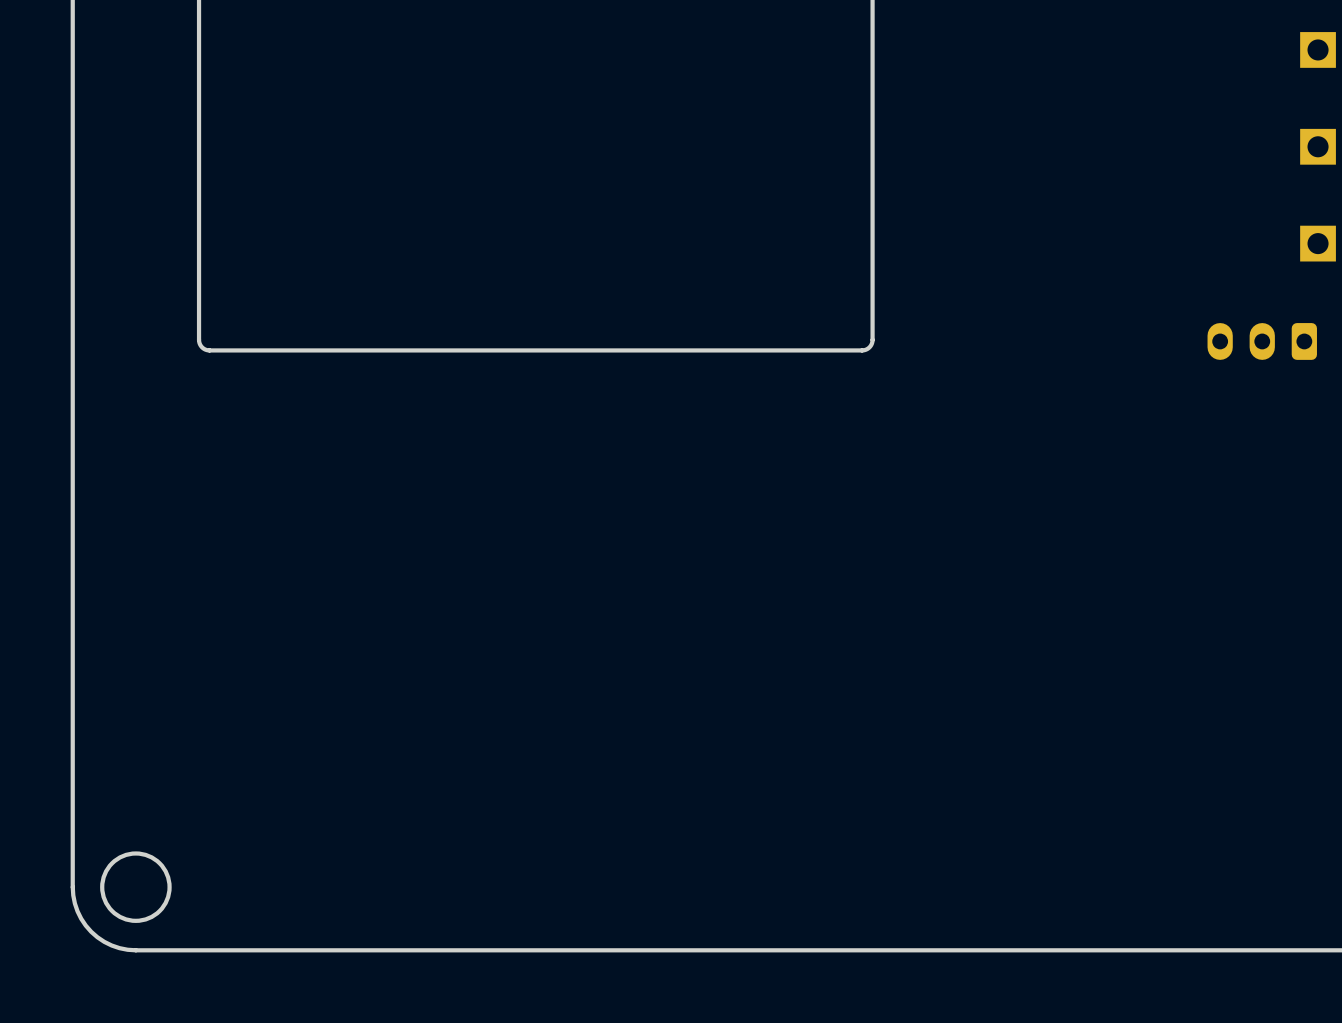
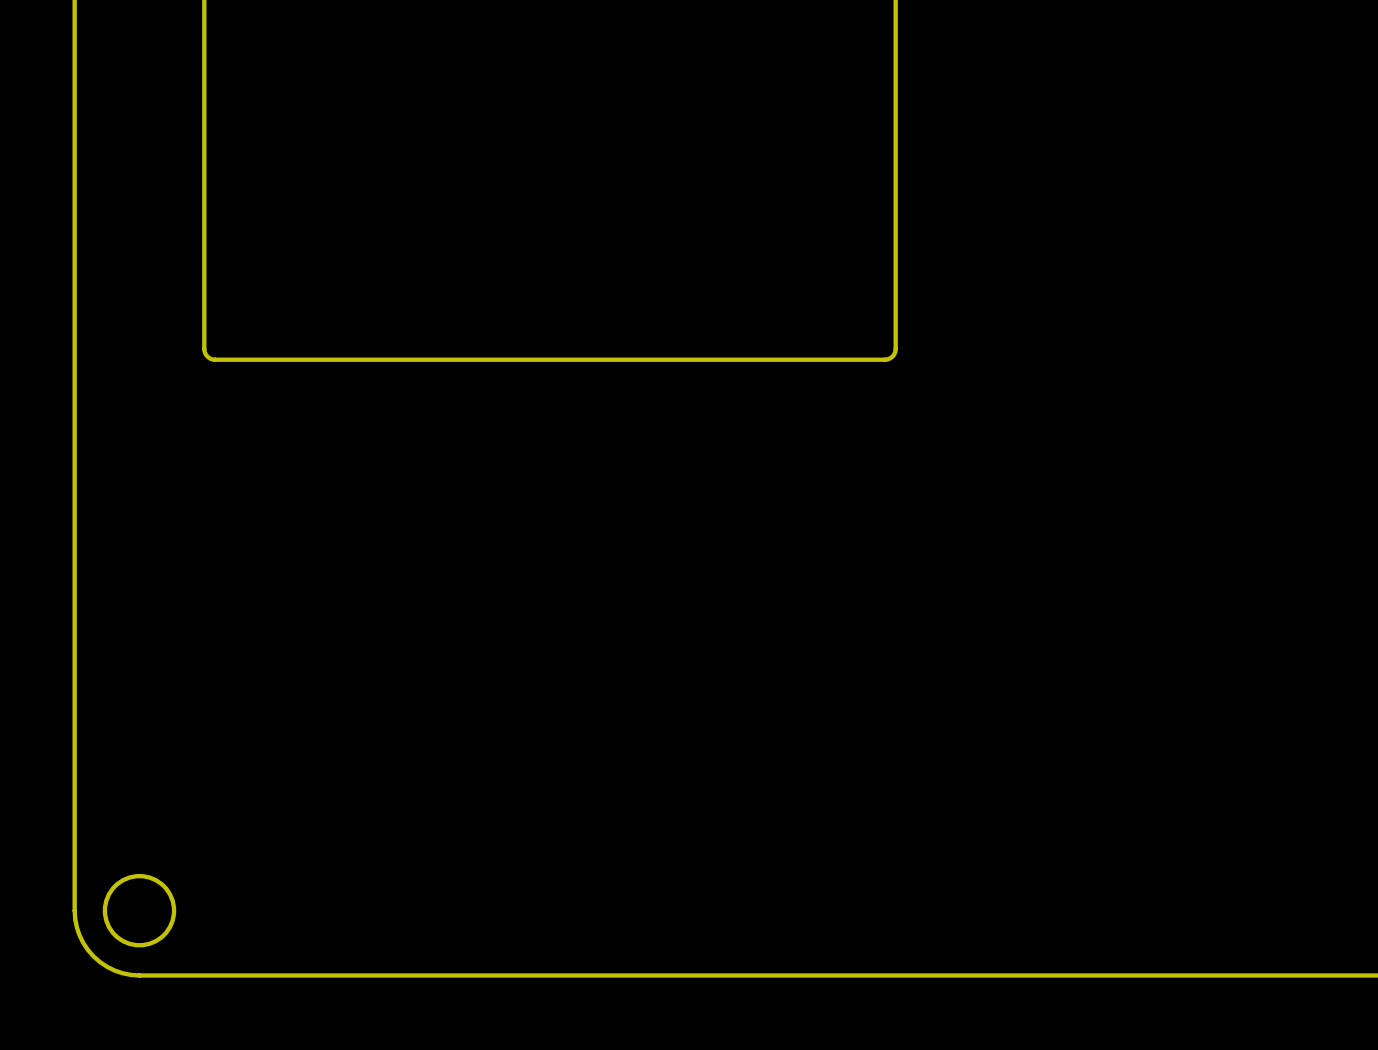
part: (1318, 49) -> none
part: (1318, 146) -> none
part: (1318, 243) -> none
part: (1262, 341) -> none

